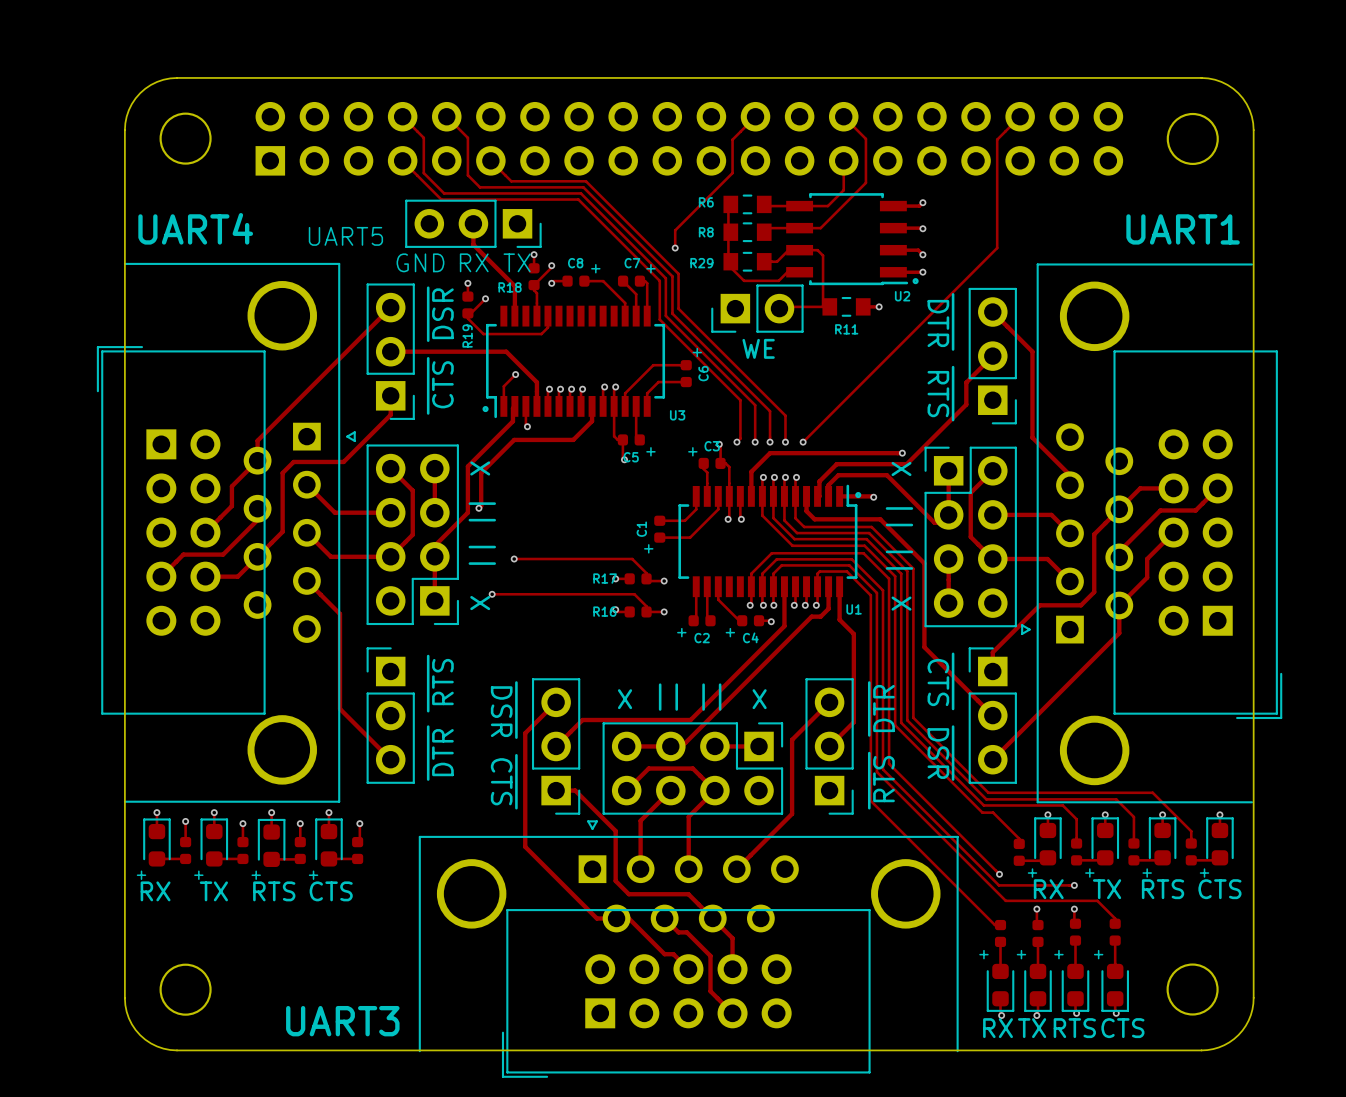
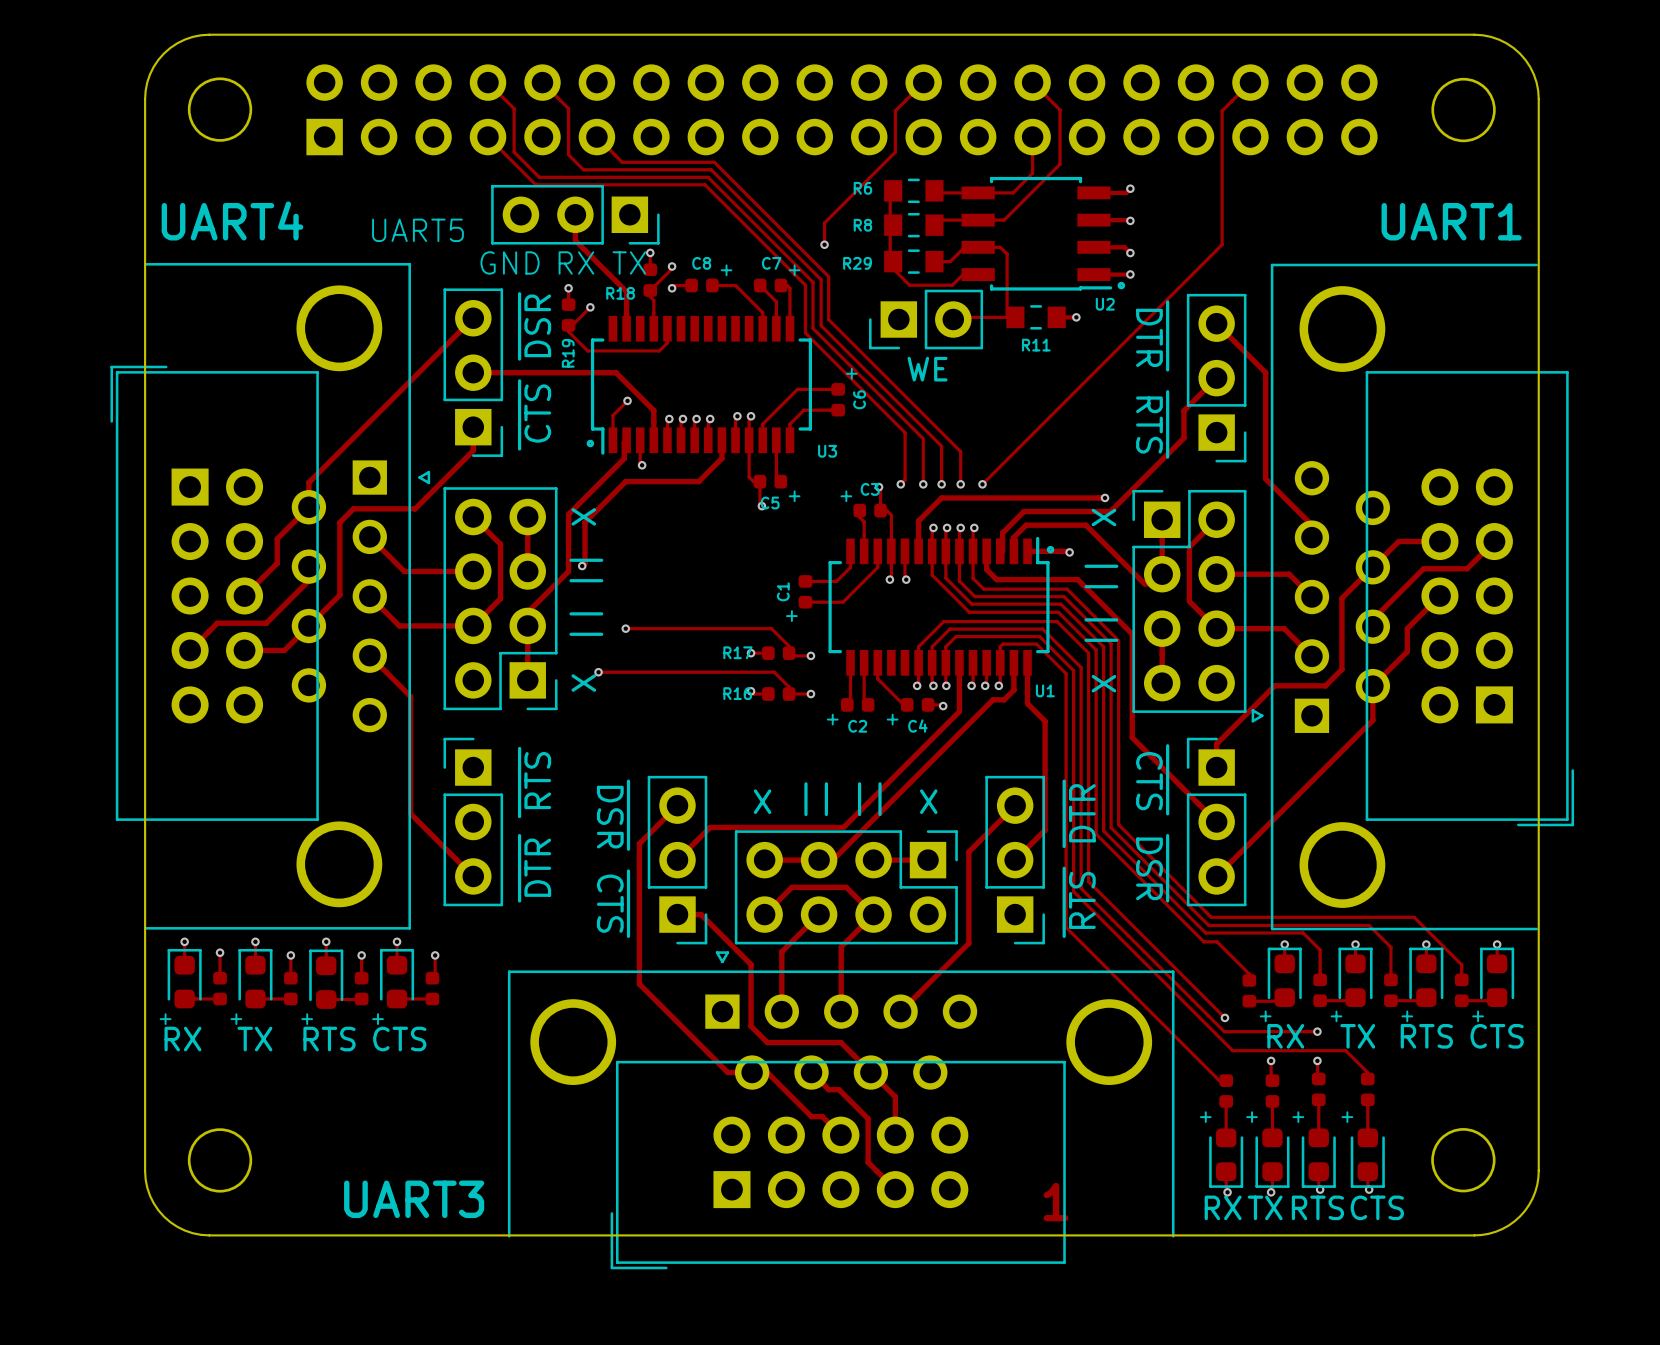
text: none -> 1 (1056, 1202)

